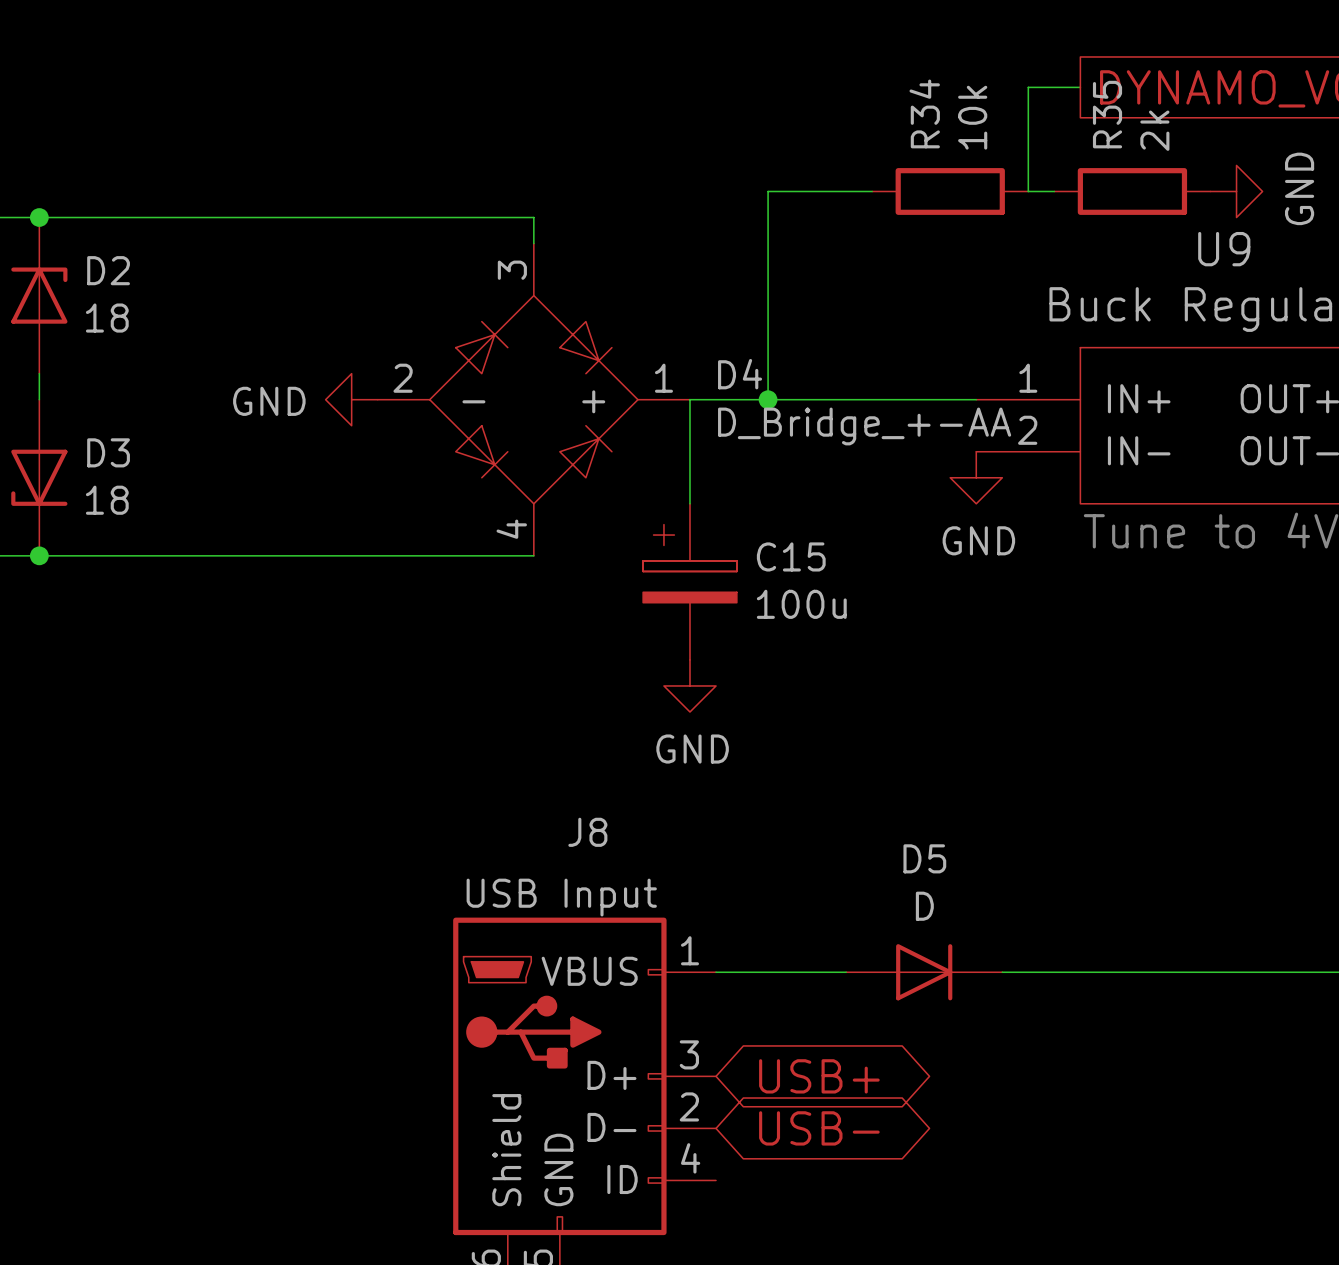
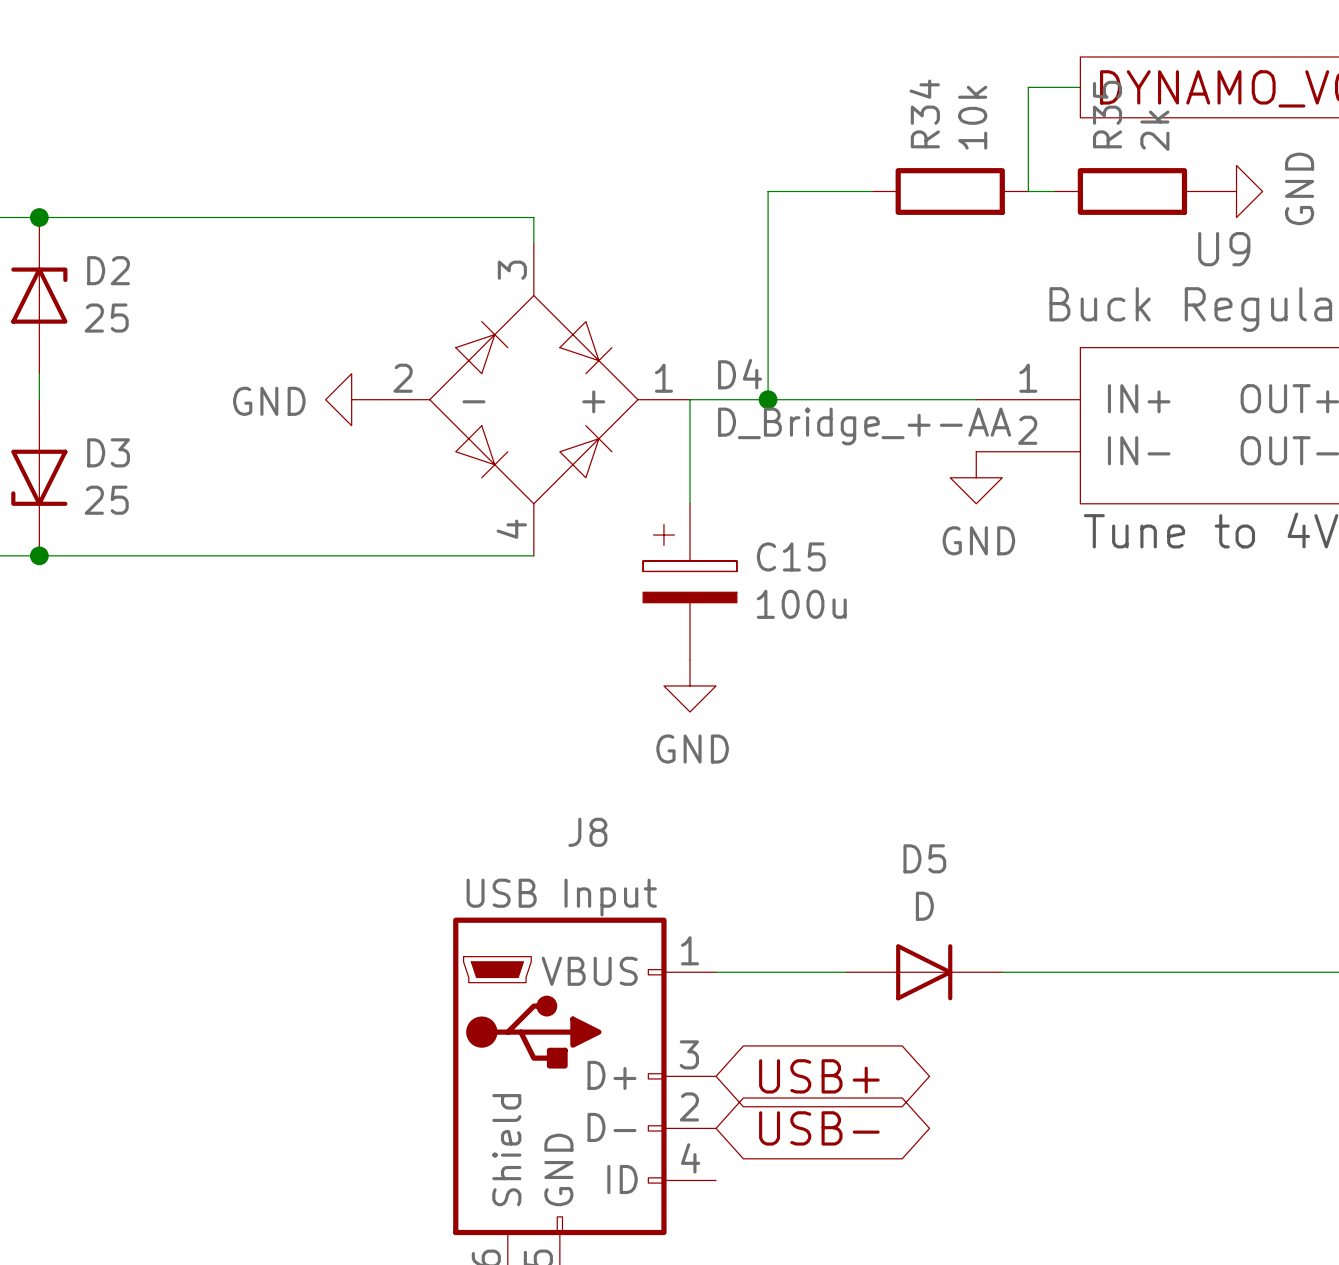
D2 value: 18 (107, 318) -> 25 (106, 318)
D3 value: 18 (107, 500) -> 25 (106, 500)

